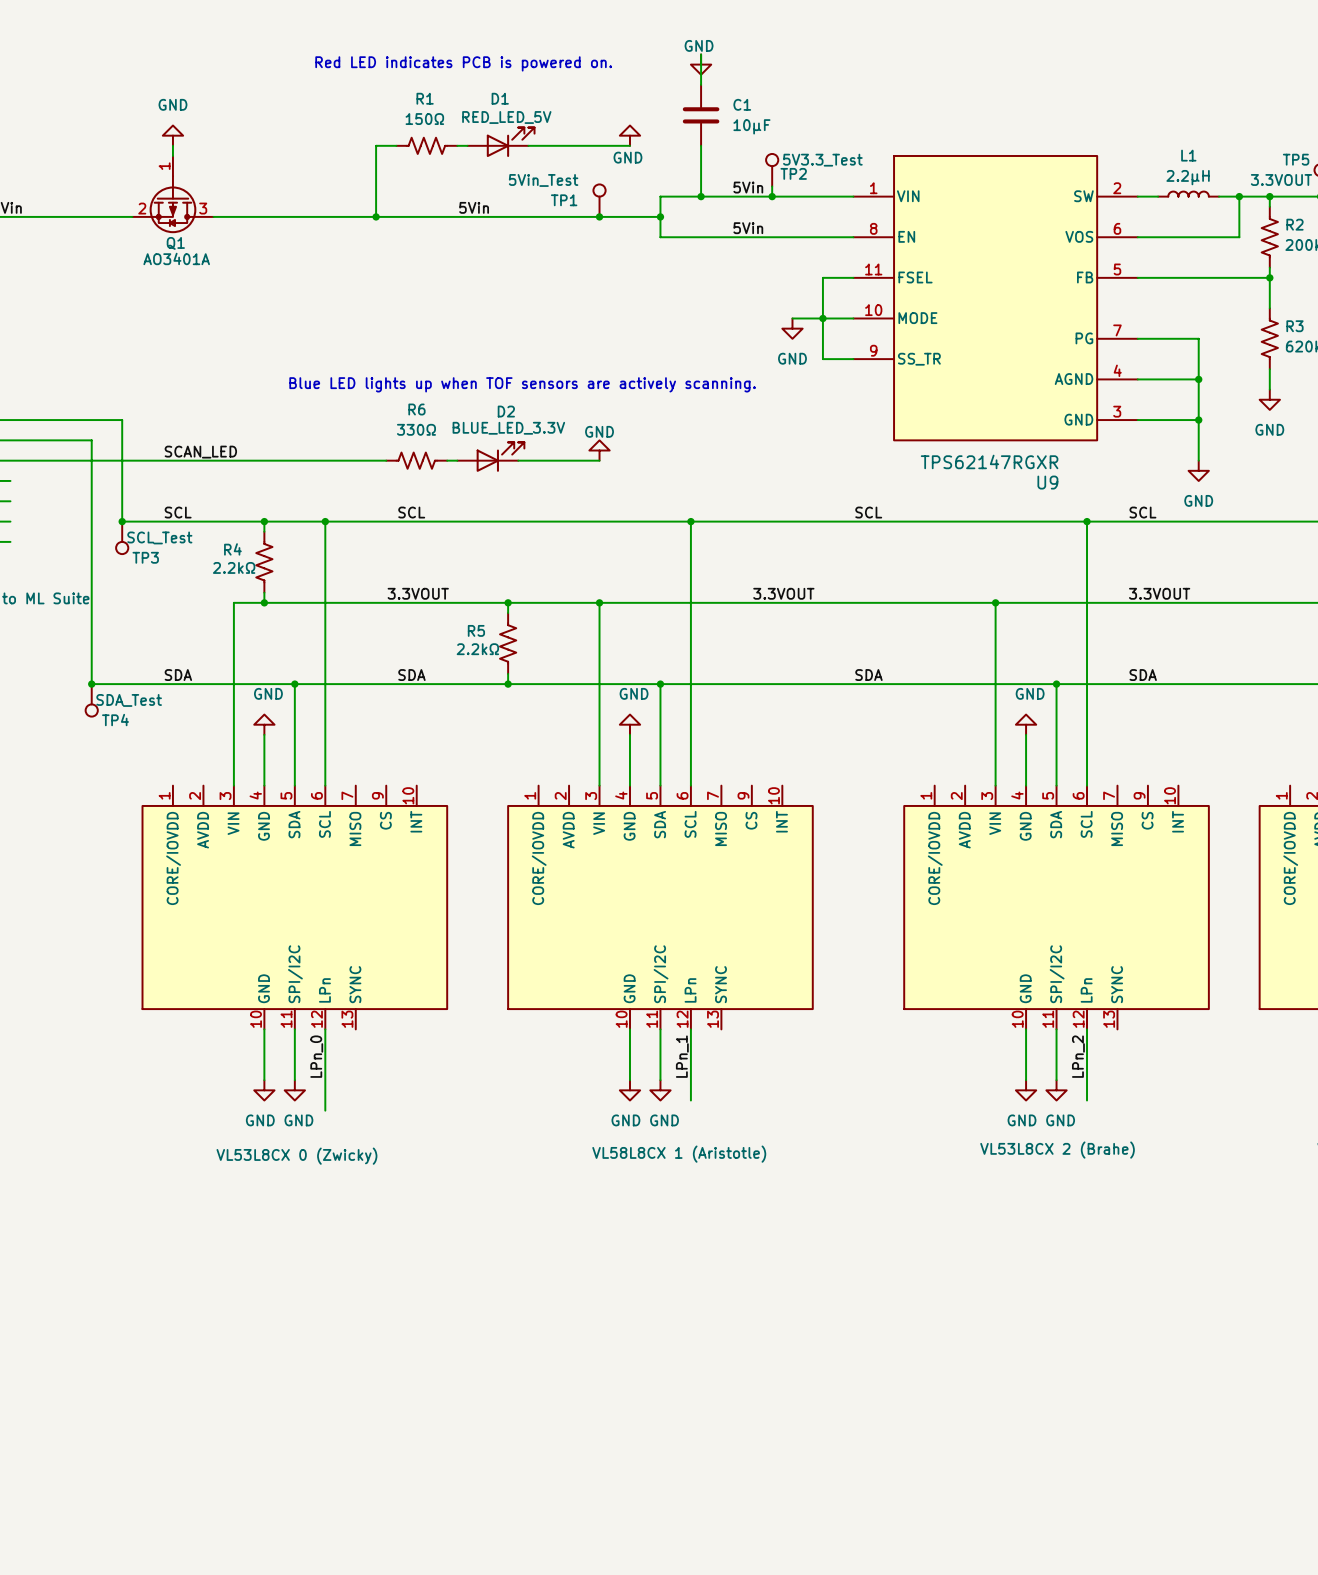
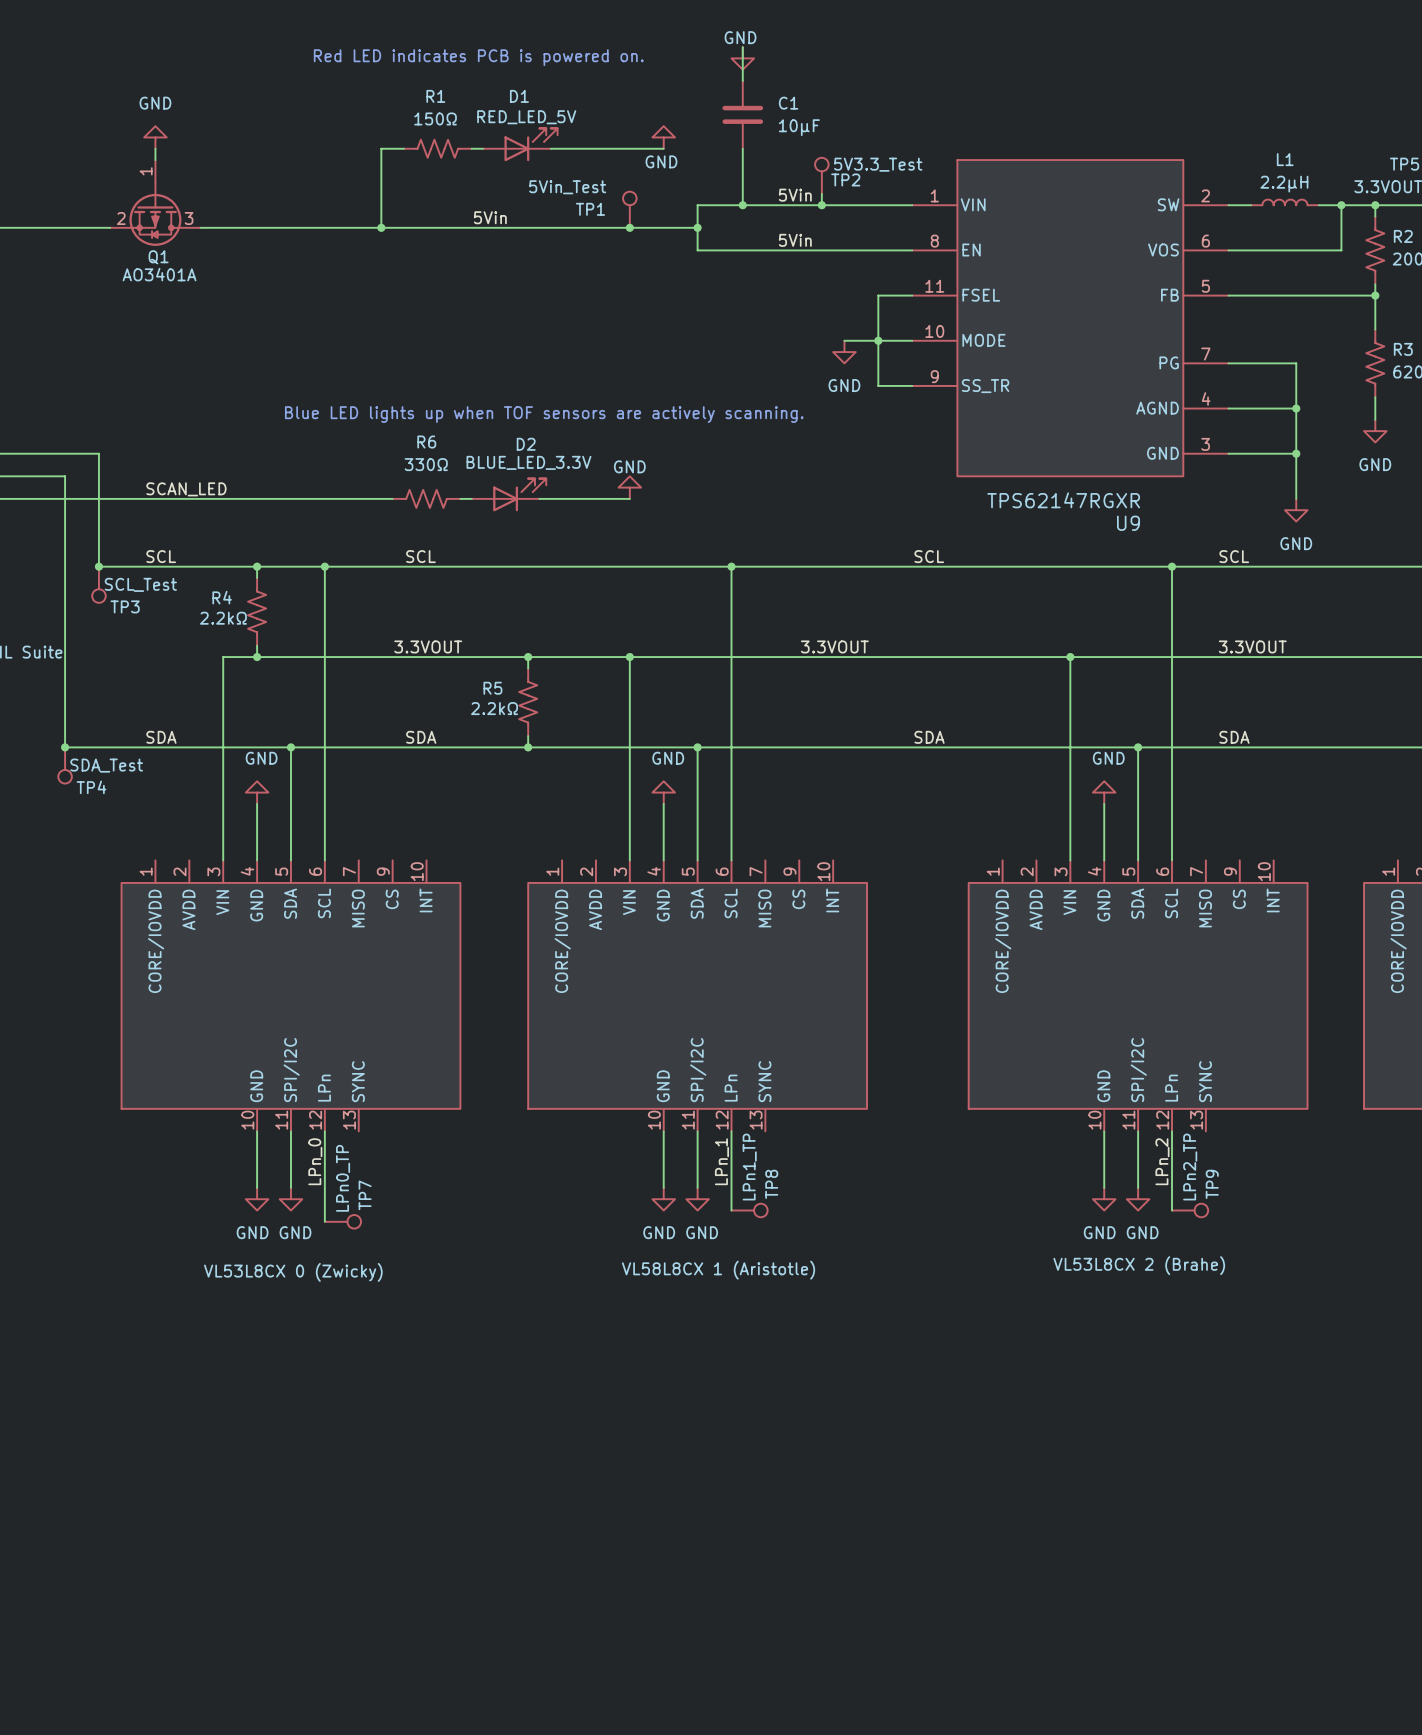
TP8: none -> LPn1_TP (749, 1210)
TP9: none -> LPn2_TP (1190, 1210)
TP7: none -> LPn0_TP (342, 1221)

